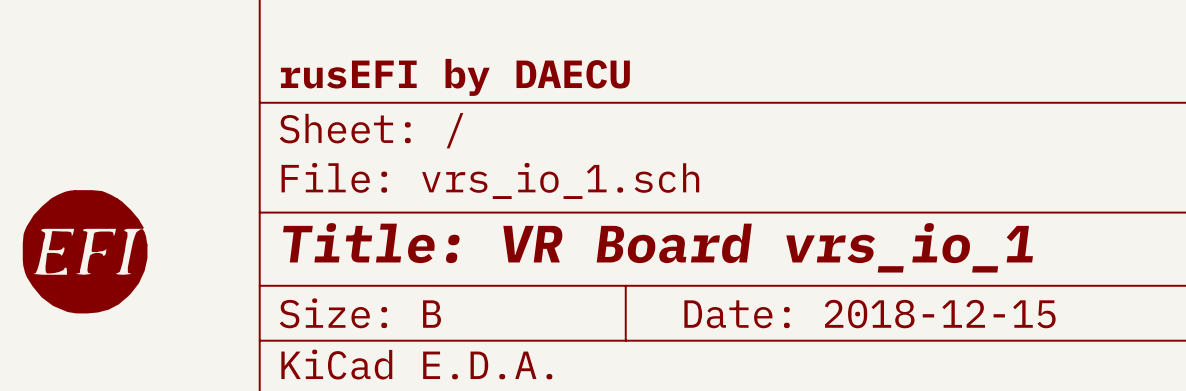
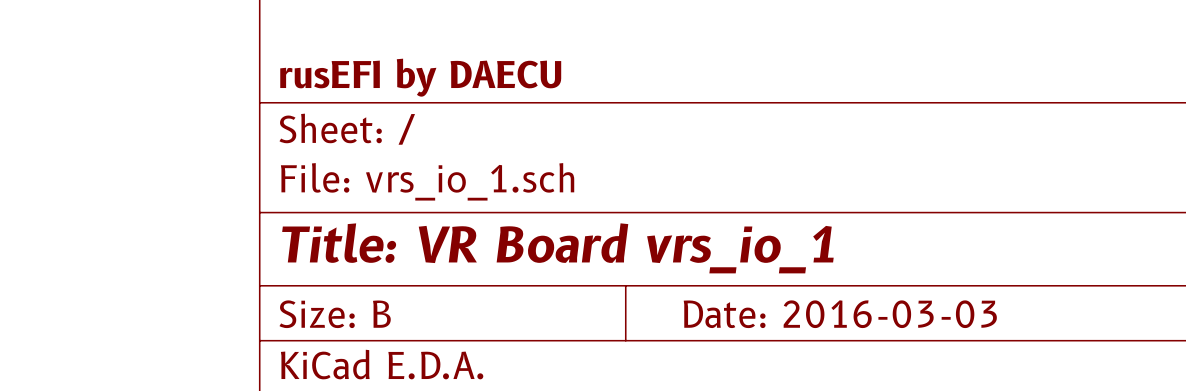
power symbol: (85, 251) -> none
title block: Date: 2018-12-15 (870, 314) -> Date: 2016-03-03 (840, 314)

